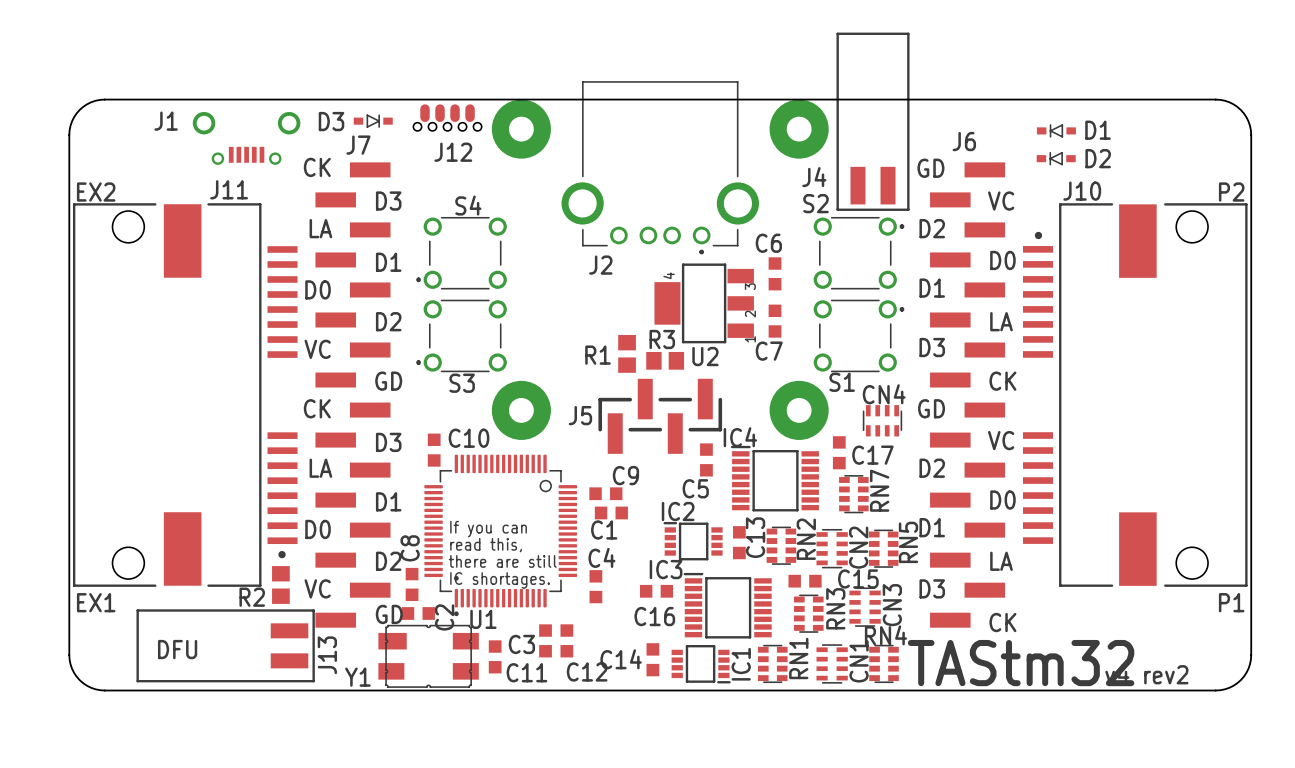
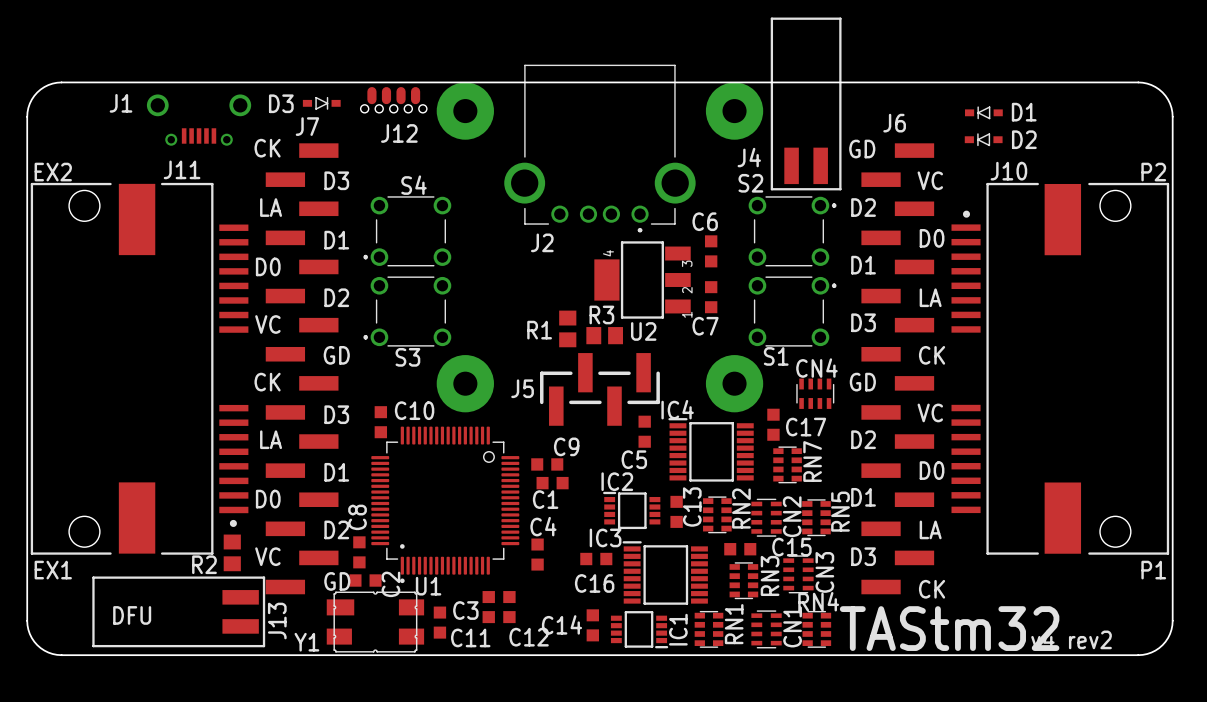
text: If you can (488, 529) -> none
text: read this, (486, 545) -> none
text: there are still (502, 561) -> none
text: IC shortages. (500, 580) -> none

